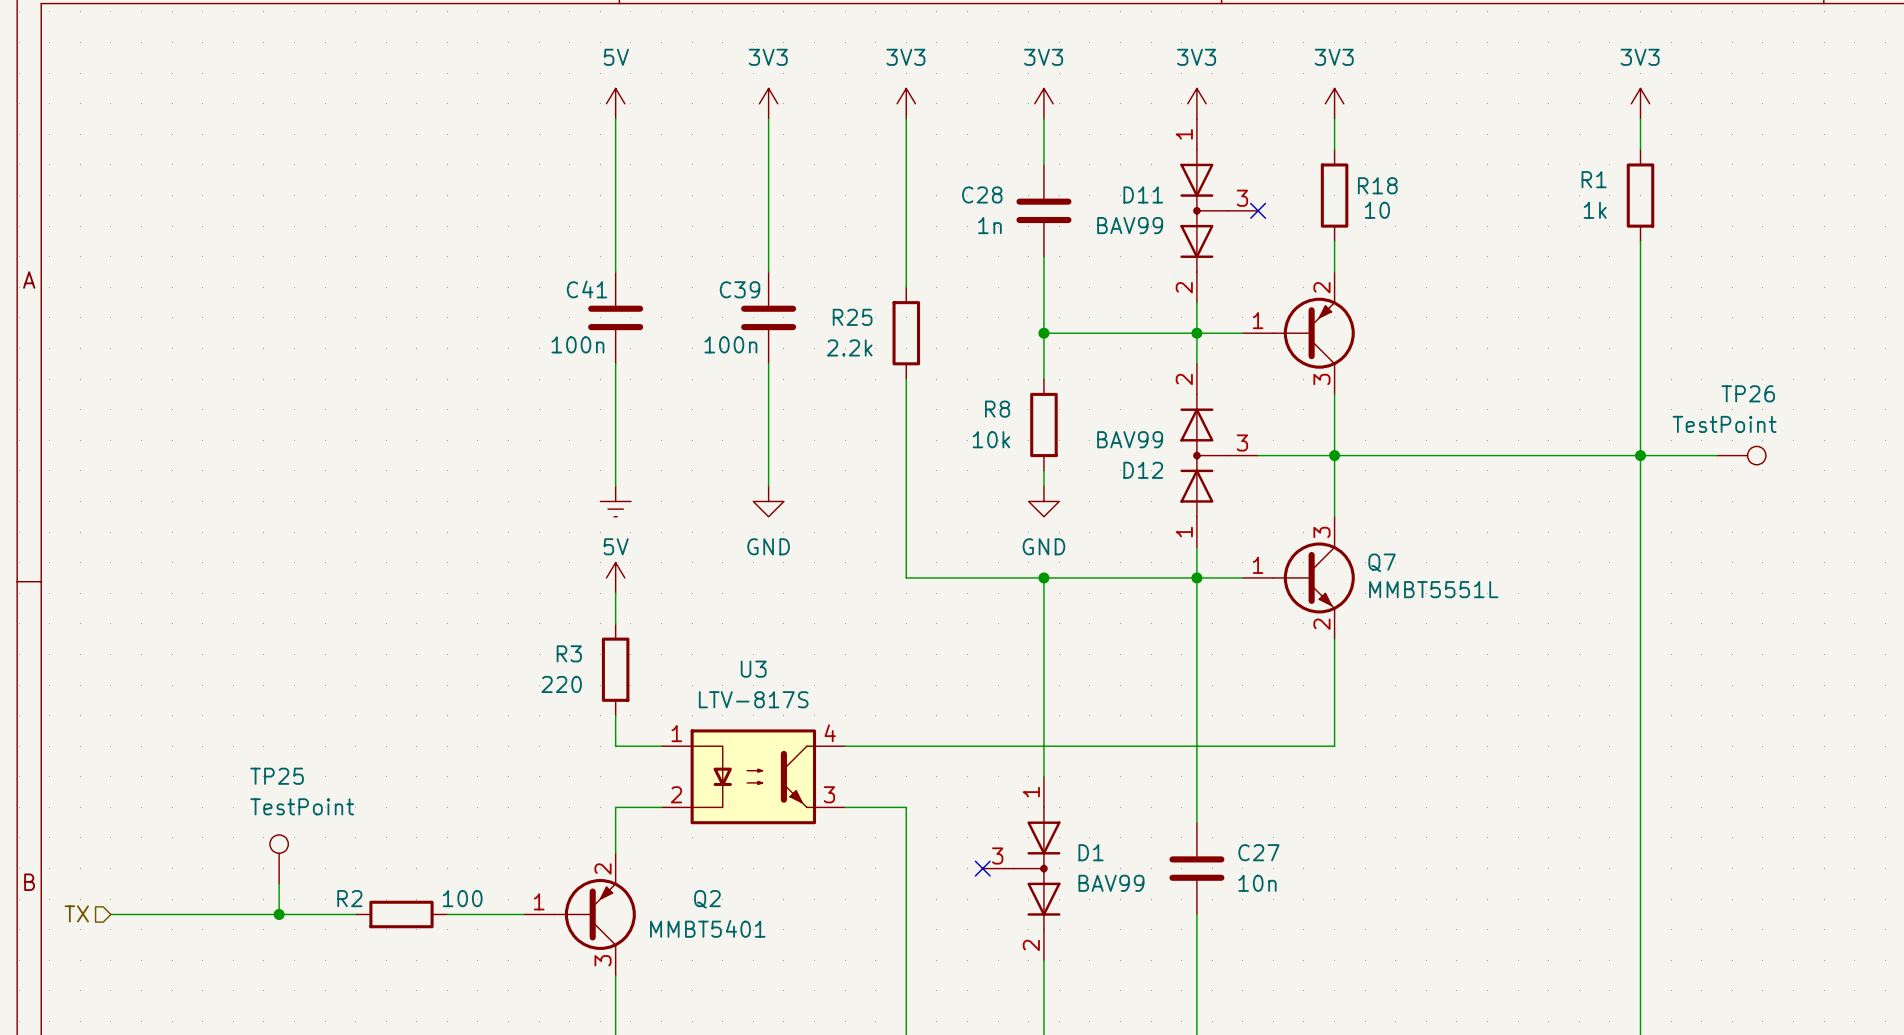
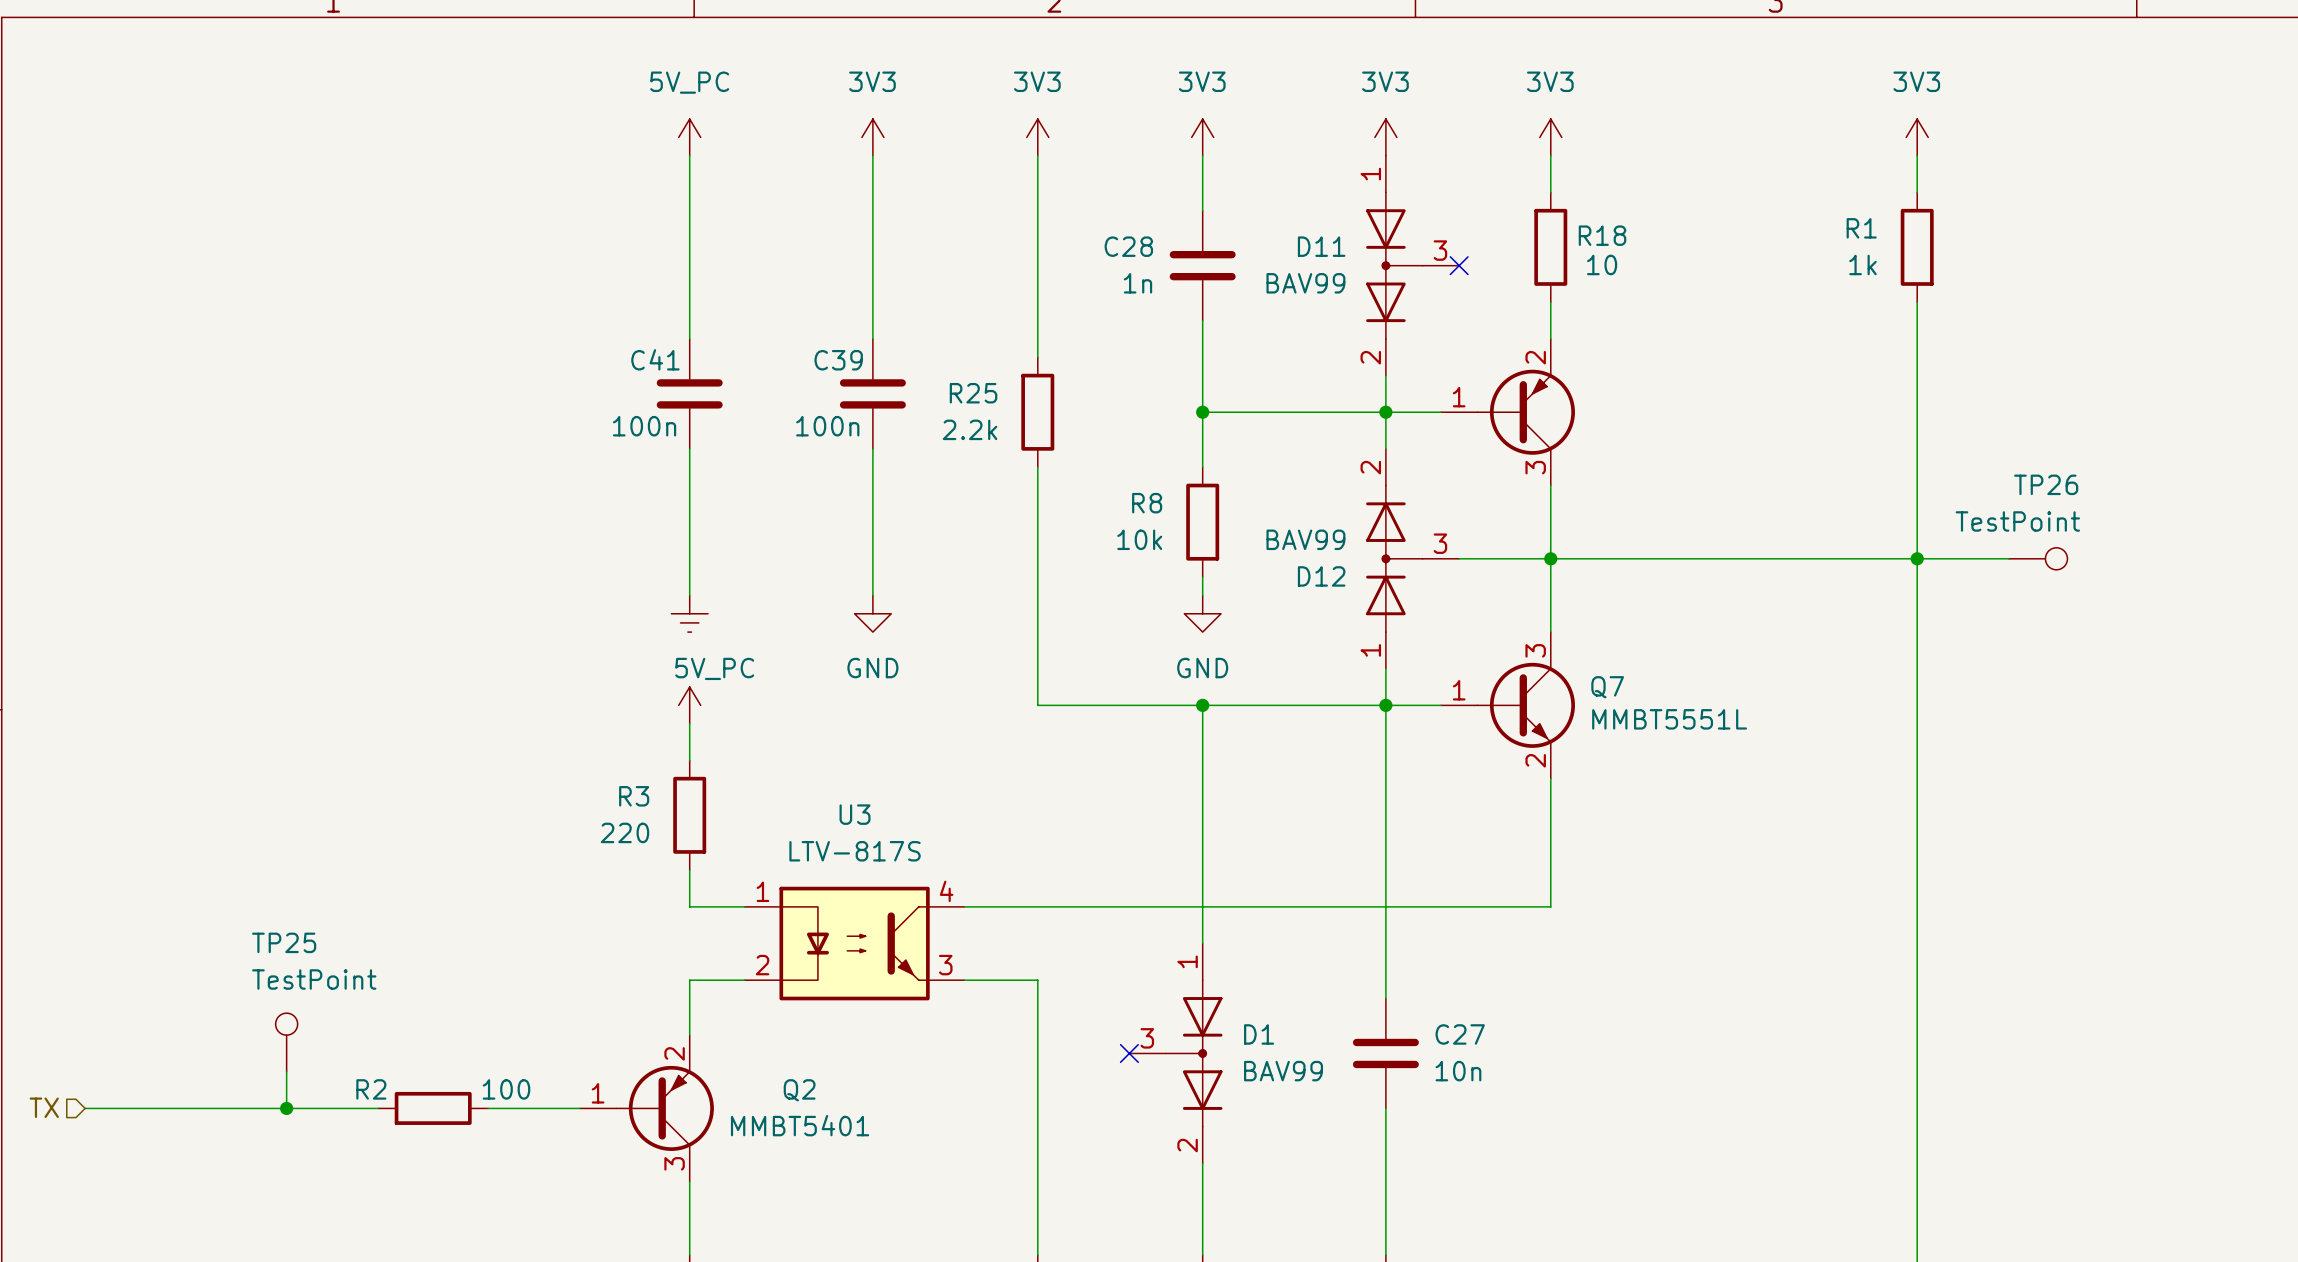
power symbol: 5V (615, 103) -> 5V_PC (689, 137)
power symbol: 5V (615, 577) -> 5V_PC (689, 705)

